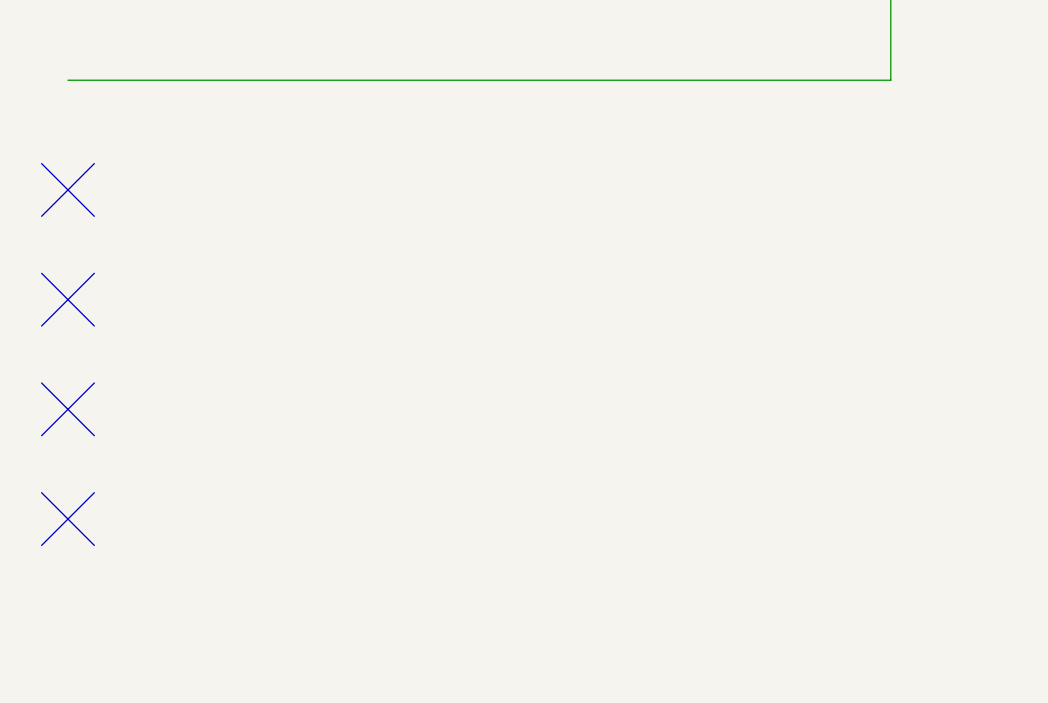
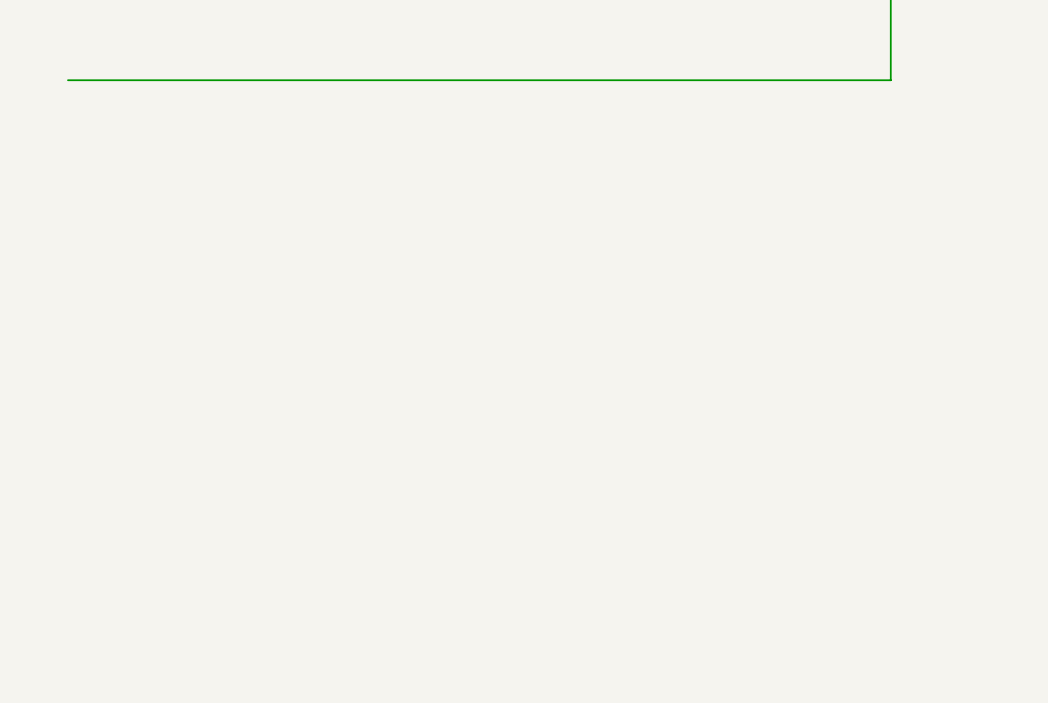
no-connect mark: (67, 189) -> none
no-connect mark: (67, 299) -> none
no-connect mark: (67, 409) -> none
no-connect mark: (67, 519) -> none

